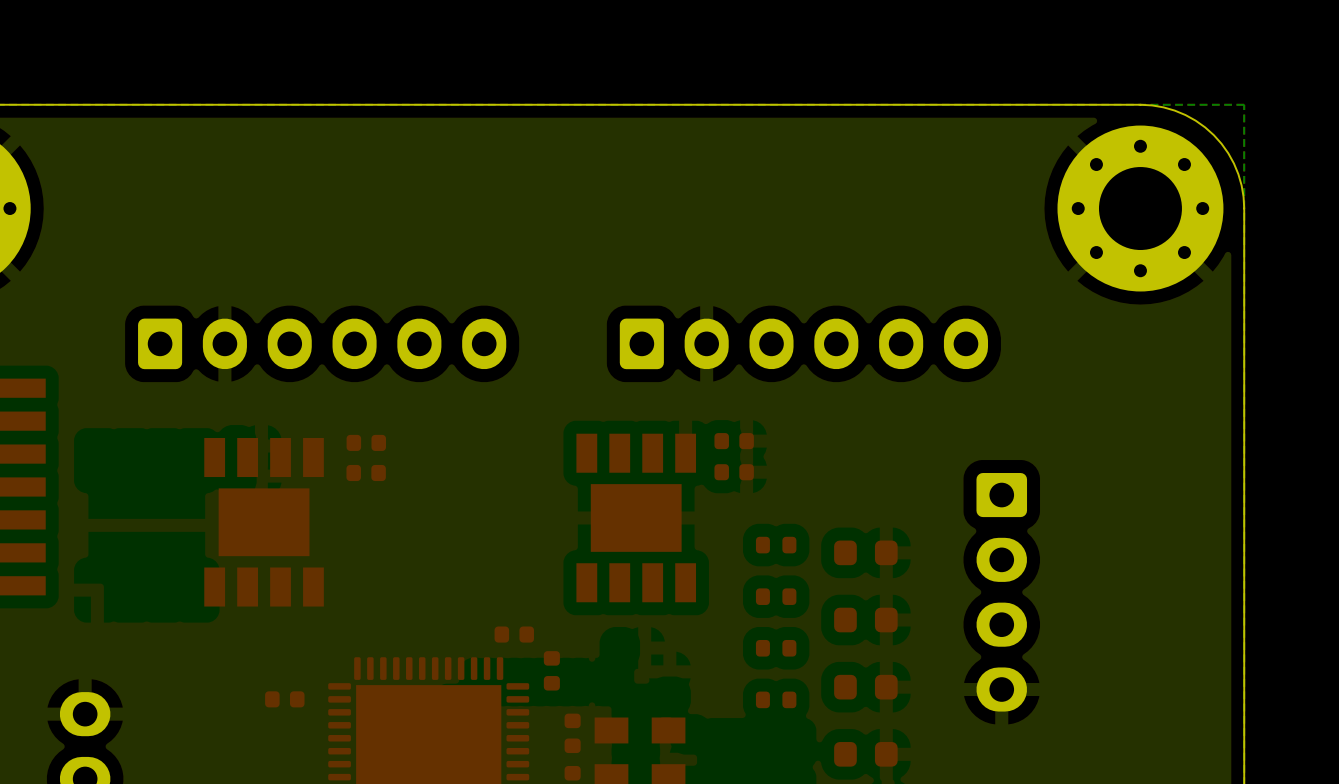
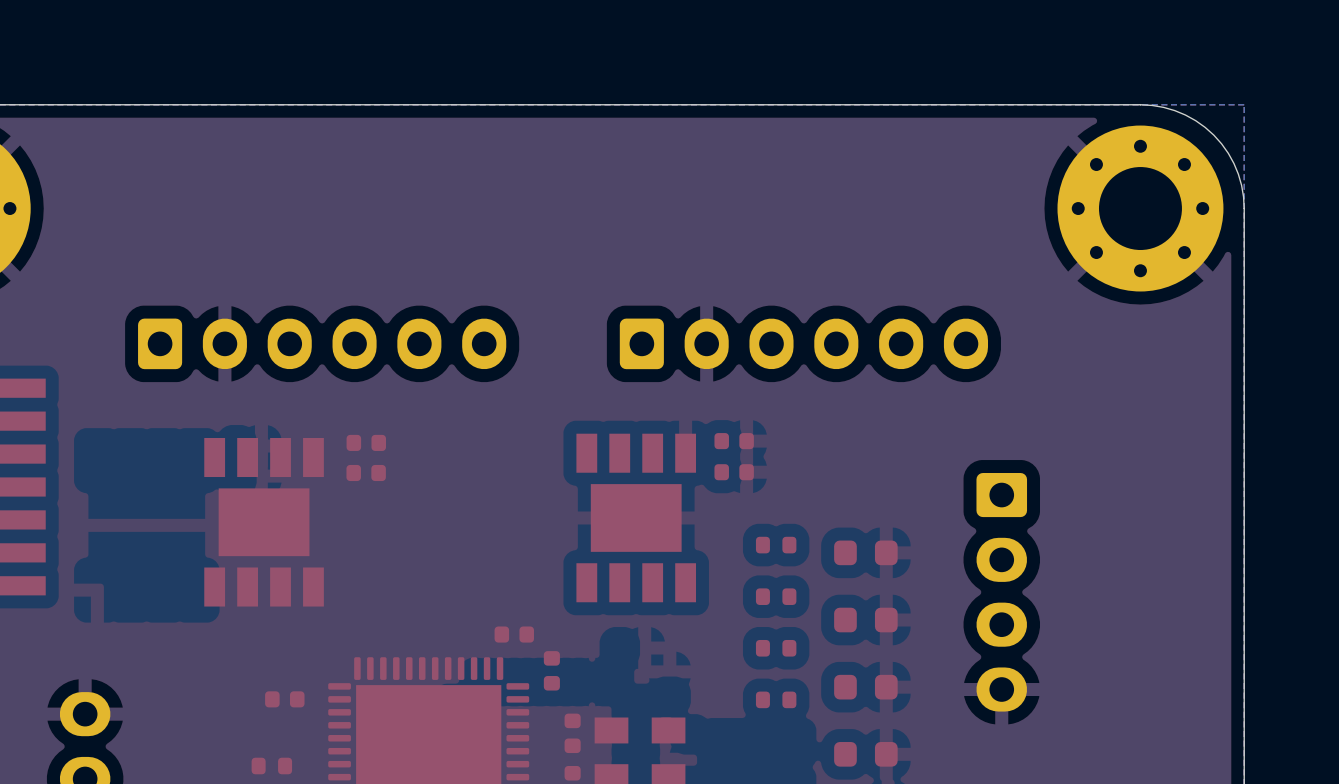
part: none -> (271, 766)

